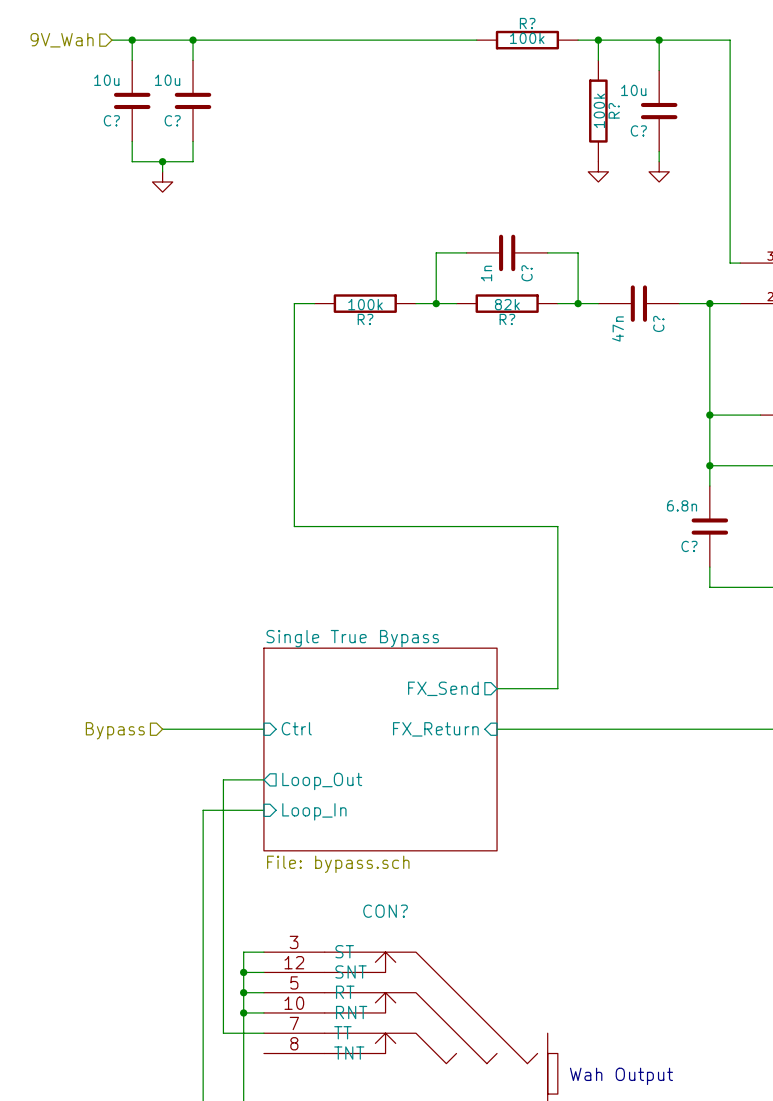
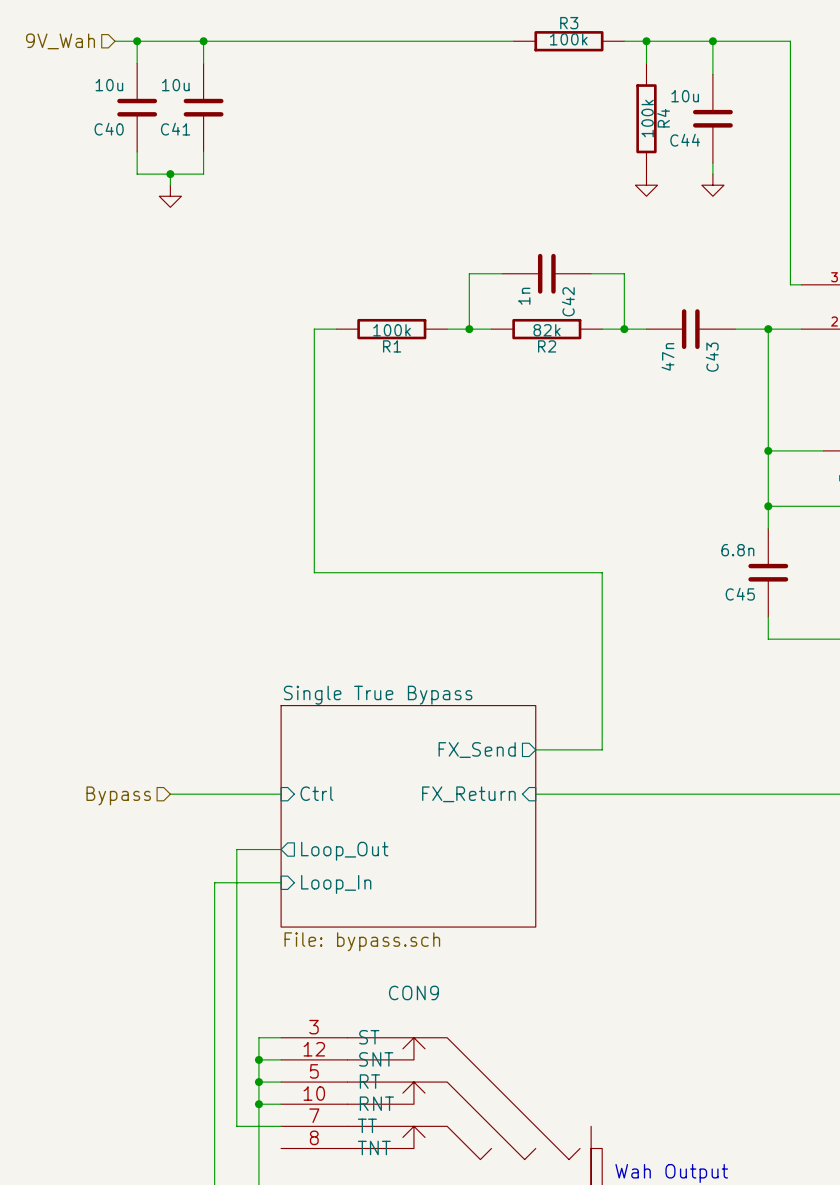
R? name: R? (527, 23) -> R3 (569, 23)
R? name: R? (614, 110) -> R4 (663, 118)
C? name: C? (111, 120) -> C40 (109, 129)
C? name: C? (172, 120) -> C41 (175, 129)
C? name: C? (638, 130) -> C44 (685, 140)
C? name: C? (527, 273) -> C42 (568, 301)
R? name: R? (365, 319) -> R1 (392, 346)
R? name: R? (507, 319) -> R2 (547, 346)
C? name: C? (658, 323) -> C43 (712, 357)
C? name: C? (689, 546) -> C45 (740, 594)
CON? name: CON? (385, 911) -> CON9 (413, 992)

